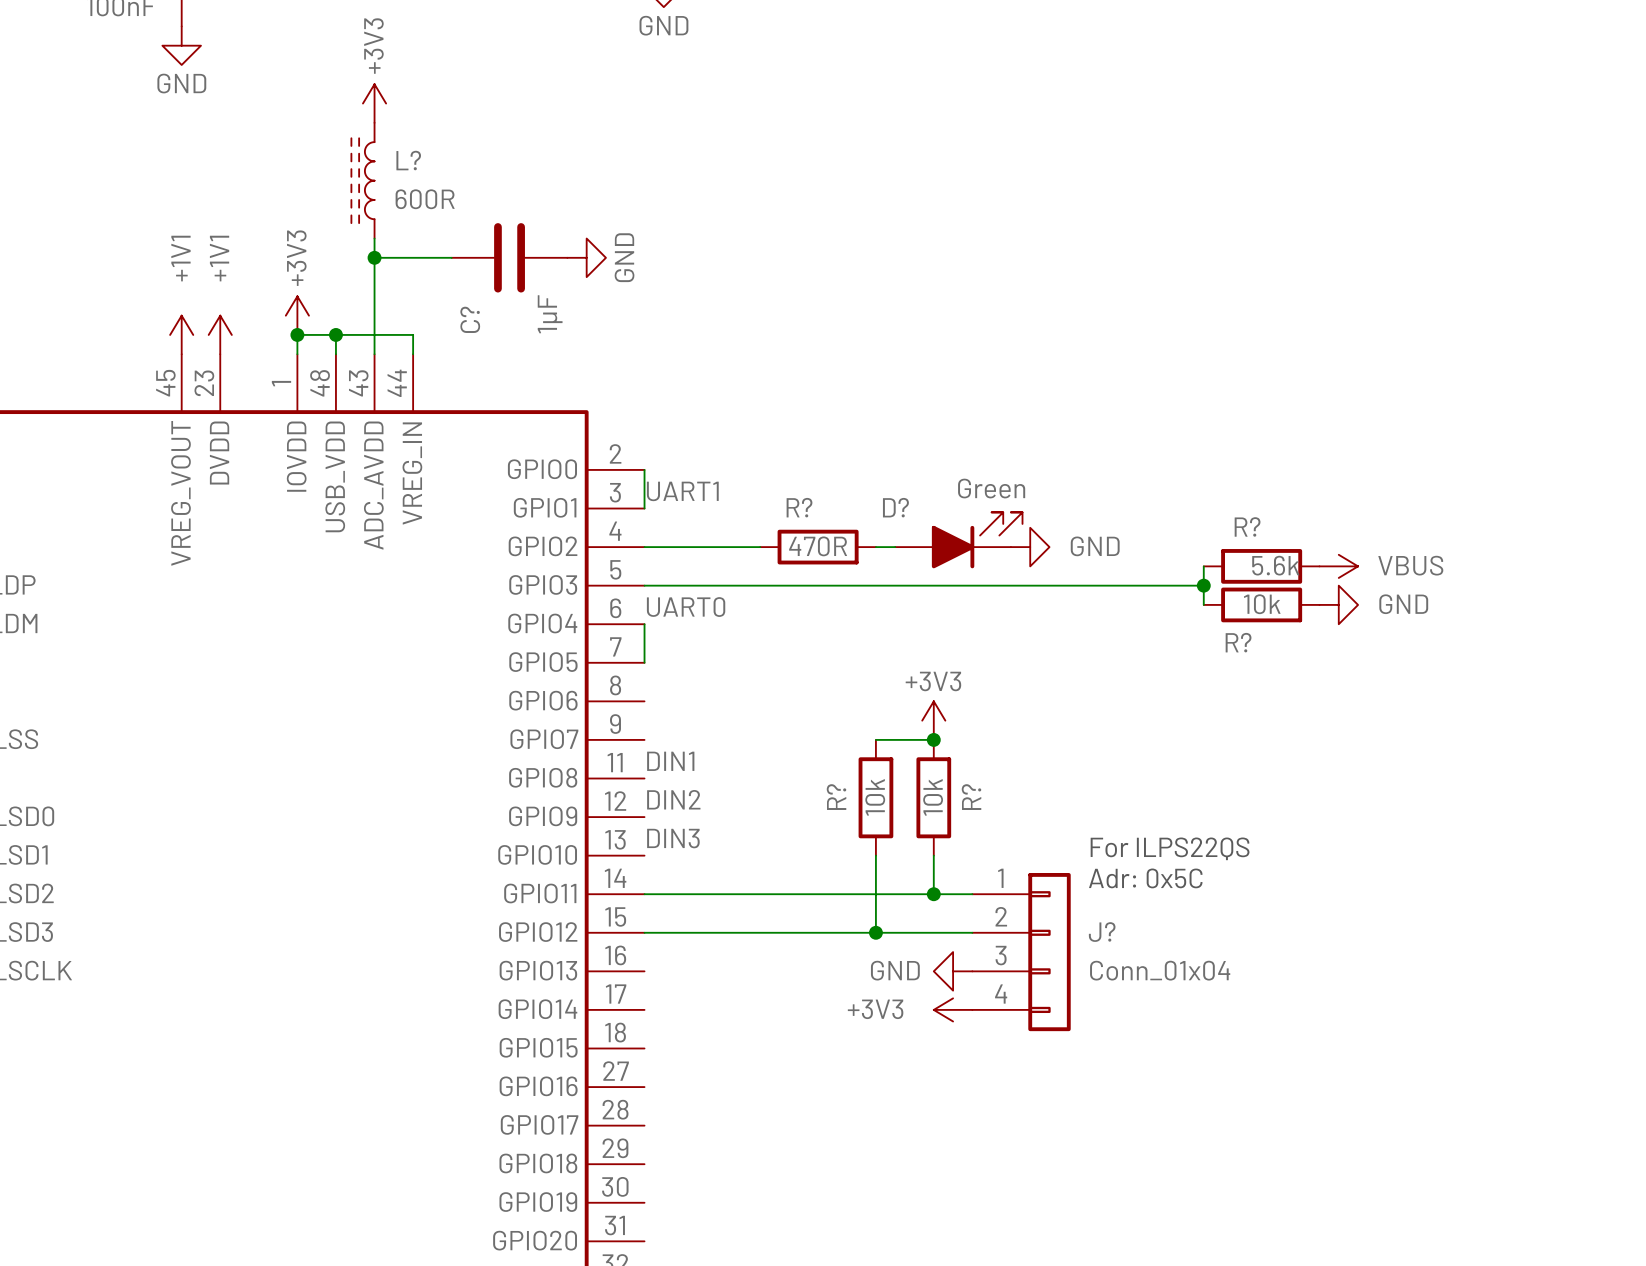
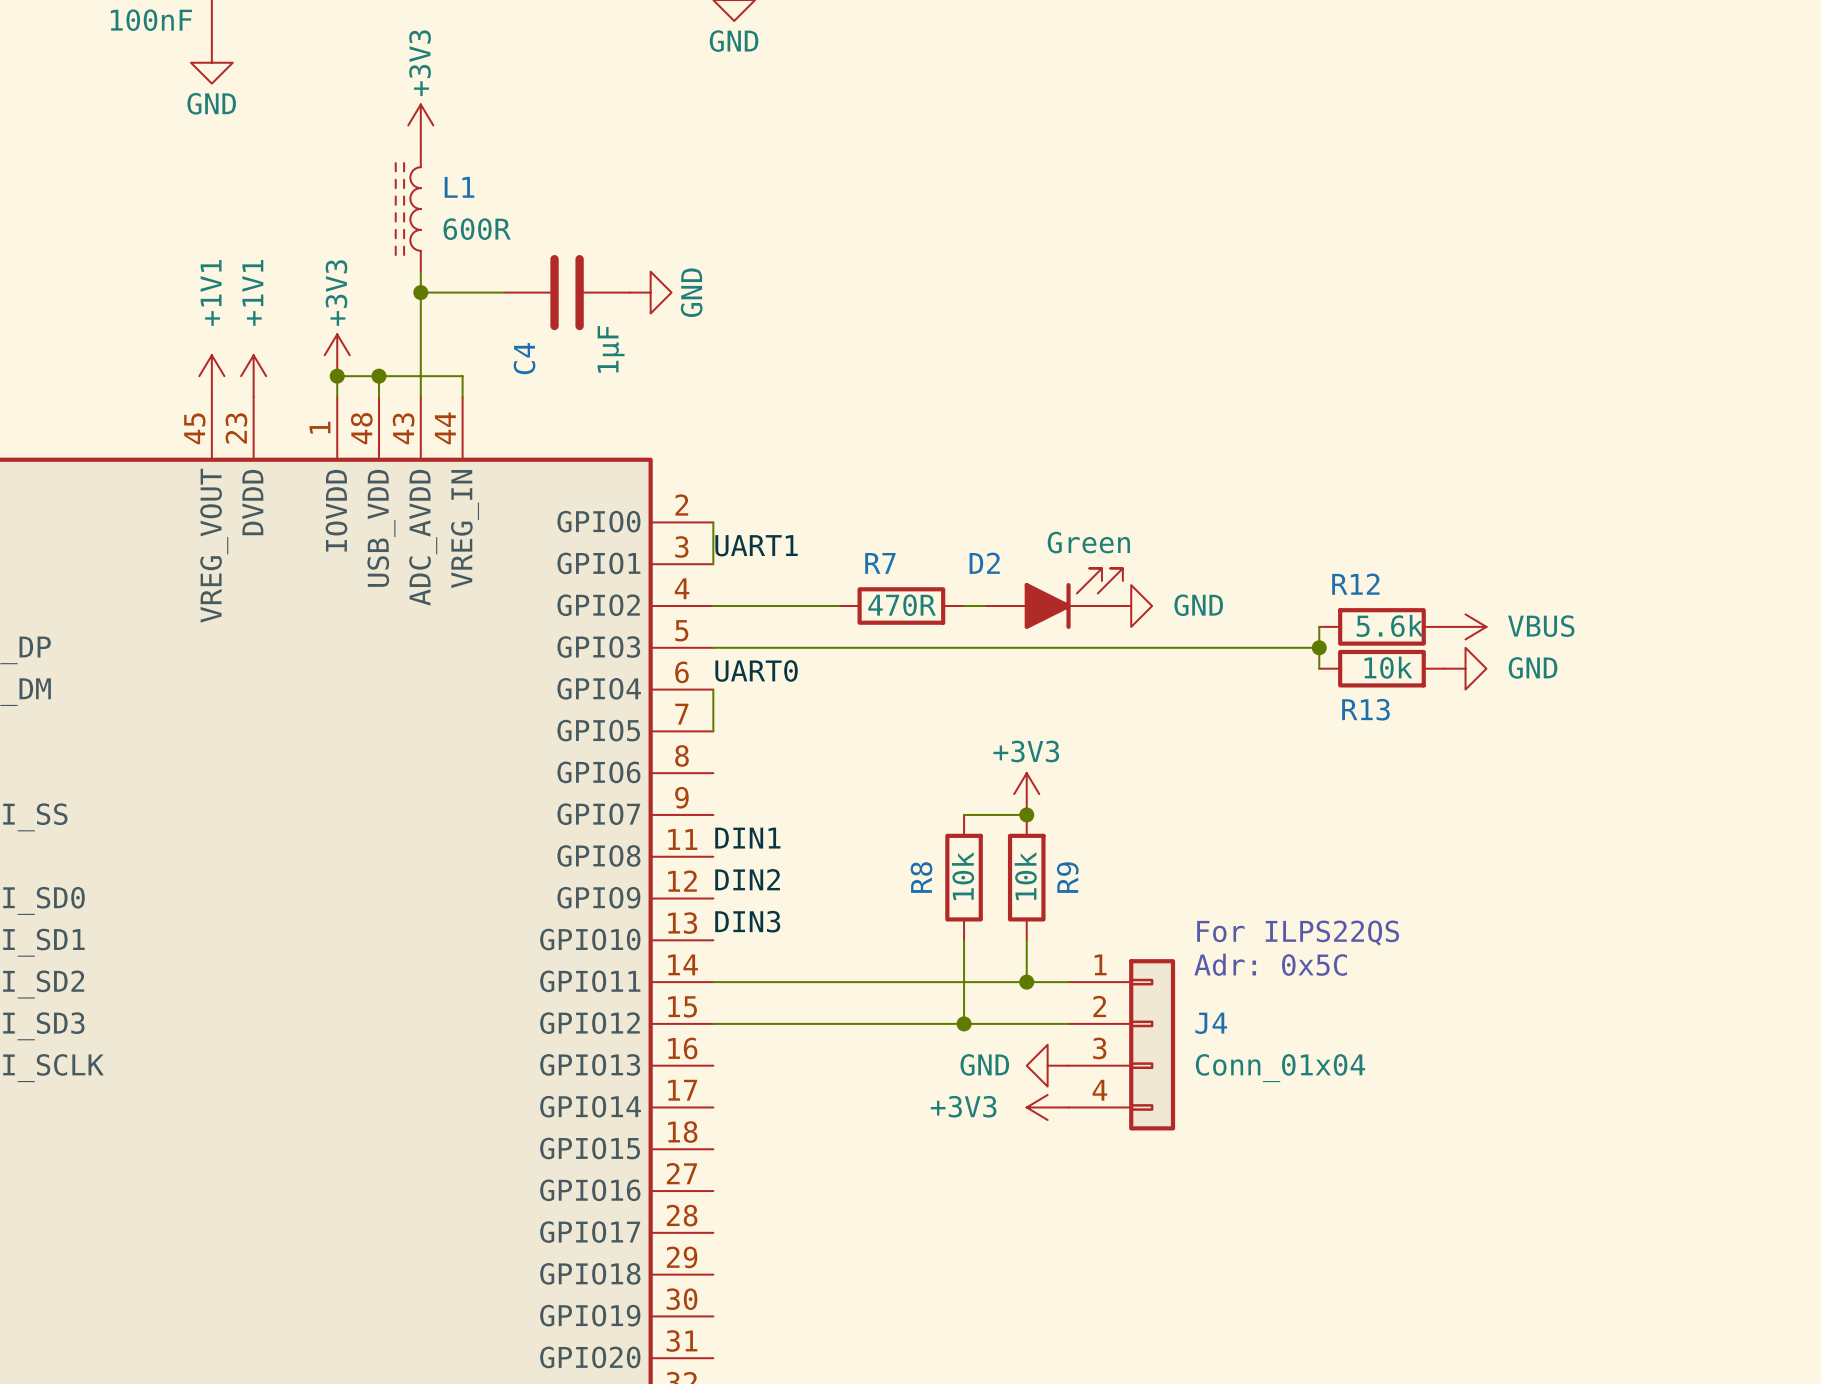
L? name: L? (408, 160) -> L1 (459, 187)
C? name: C? (470, 319) -> C4 (524, 358)
R? name: R? (799, 507) -> R7 (880, 563)
D? name: D? (895, 507) -> D2 (984, 563)
R? name: R? (1247, 526) -> R12 (1355, 584)
R? name: R? (1238, 642) -> R13 (1365, 709)
R? name: R? (836, 797) -> R8 (921, 877)
R? name: R? (971, 797) -> R9 (1067, 877)
J? name: J? (1102, 932) -> J4 (1211, 1023)

